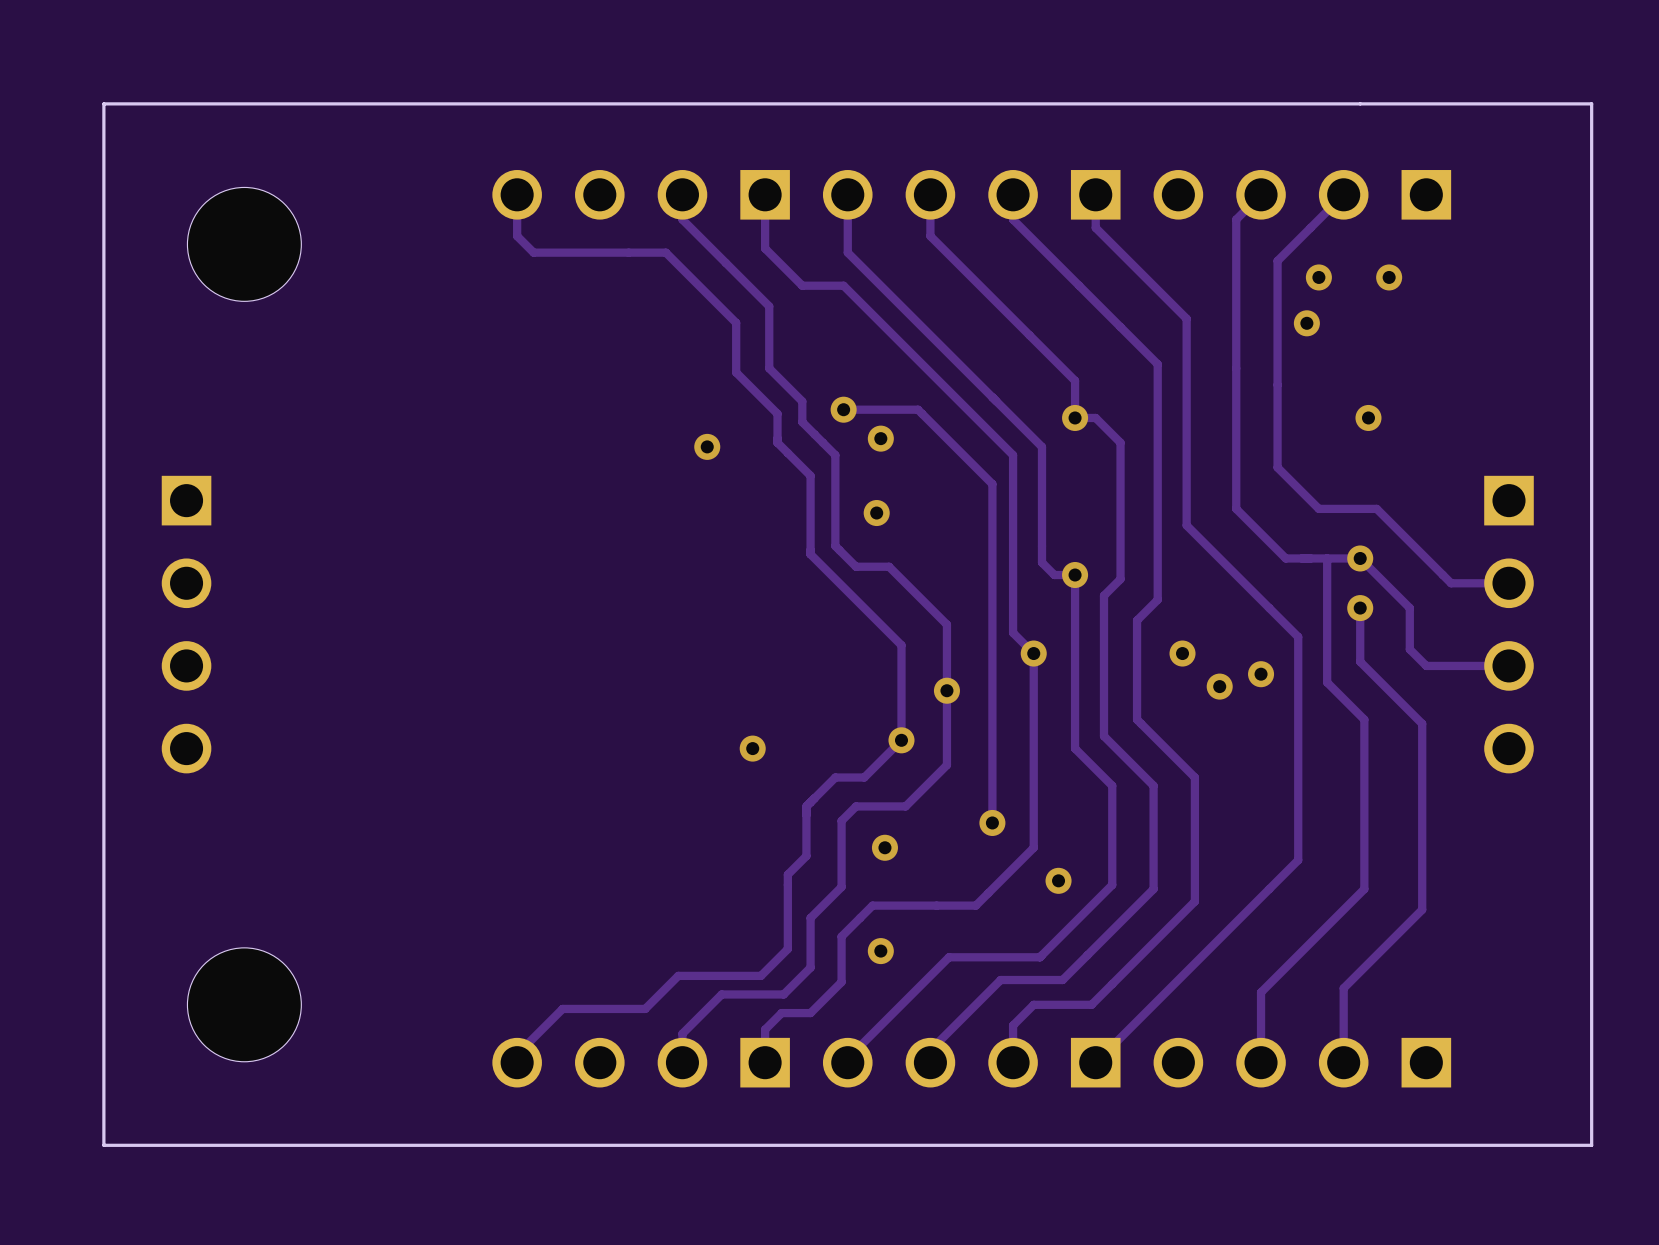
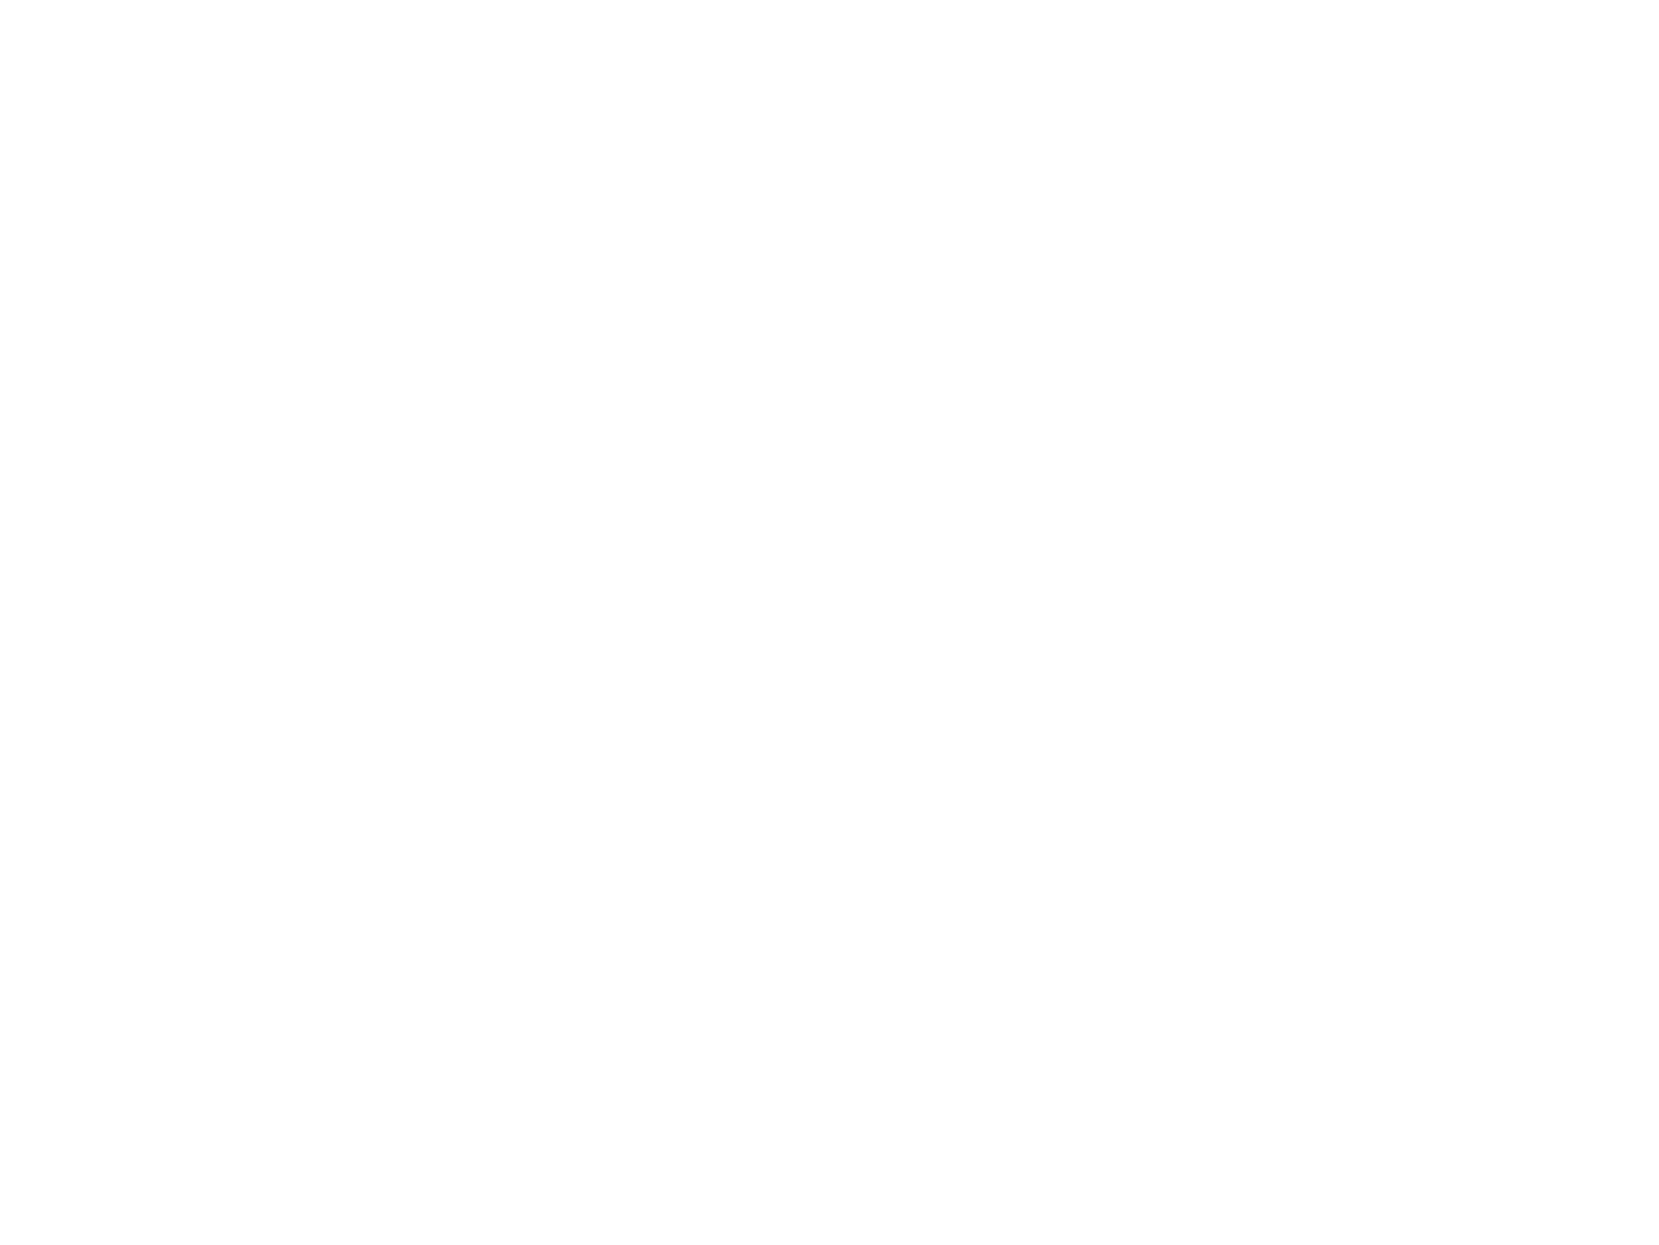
board edge: (1591, 103) (103, 103) (103, 1145) (1591, 1145) (1591, 103) -> none
track: (517, 194) (517, 236) (533, 252) (665, 252) (736, 322) (736, 372) (777, 413) (777, 442) (810, 475) (810, 554) (901, 645) (901, 740) (864, 777) (835, 777) (806, 806) (806, 856) (787, 874) (787, 949) (760, 975) (678, 975) (645, 1008) (562, 1008) (517, 1054) (517, 1062) -> none
part: (641, 194) -> none
track: (682, 194) (682, 219) (769, 306) (769, 368) (802, 401) (802, 422) (835, 455) (835, 546) (856, 566) (889, 566) (946, 624) (946, 765) (905, 806) (856, 806) (841, 820) (841, 887) (810, 918) (810, 967) (783, 994) (721, 994) (682, 1033) (682, 1062) -> none
track: (765, 194) (765, 248) (802, 285) (843, 285) (1013, 455) (1013, 632) (1033, 653) (1033, 847) (975, 905) (872, 905) (841, 936) (841, 982) (810, 1013) (781, 1013) (765, 1029) (765, 1062) -> none
track: (847, 194) (847, 252) (1042, 446) (1042, 562) (1054, 575) (1075, 575) (1075, 748) (1112, 785) (1112, 884) (1039, 957) (949, 957) (847, 1058) (847, 1062) -> none
track: (930, 194) (930, 236) (1075, 380) (1075, 417) (1095, 417) (1120, 442) (1120, 579) (1103, 595) (1103, 736) (1153, 785) (1153, 889) (1062, 980) (1000, 980) (930, 1050) (930, 1062) -> none
part: (971, 194) -> none
track: (1013, 194) (1013, 219) (1157, 364) (1157, 599) (1137, 620) (1137, 719) (1194, 777) (1194, 901) (1091, 1004) (1033, 1004) (1013, 1025) (1013, 1062) -> none
track: (1095, 194) (1095, 227) (1186, 318) (1186, 525) (1298, 637) (1298, 860) (1095, 1062) -> none
track: (1261, 194) (1236, 219) (1236, 508) (1285, 558) (1360, 558) (1409, 608) (1409, 649) (1426, 665) (1509, 665) -> none
part: (1302, 194) -> none
track: (1343, 194) (1277, 260) (1277, 467) (1318, 508) (1376, 508) (1451, 583) (1509, 583) -> none
part: (244, 244) -> none
via: (1318, 277) -> none
via: (1389, 277) -> none
via: (1306, 323) -> none
track: (843, 409) (918, 409) (992, 484) (992, 822) -> none
via: (843, 409) -> none
via: (1075, 417) -> none
via: (1368, 417) -> none
via: (880, 438) -> none
via: (707, 446) -> none
via: (876, 513) -> none
track: (1327, 558) (1327, 682) (1364, 719) (1364, 889) (1261, 992) (1261, 1062) -> none
via: (1360, 558) -> none
via: (1075, 575) -> none
track: (1360, 608) (1360, 661) (1422, 723) (1422, 909) (1343, 988) (1343, 1062) -> none
via: (1360, 608) -> none
part: (186, 624) -> none
part: (1509, 624) -> none
via: (1033, 653) -> none
via: (1182, 653) -> none
via: (1261, 674) -> none
via: (1219, 686) -> none
via: (946, 690) -> none
via: (901, 740) -> none
via: (752, 748) -> none
via: (992, 822) -> none
via: (884, 847) -> none
via: (1058, 880) -> none
via: (880, 951) -> none
part: (244, 1004) -> none
part: (641, 1062) -> none
part: (971, 1062) -> none
part: (1302, 1062) -> none

